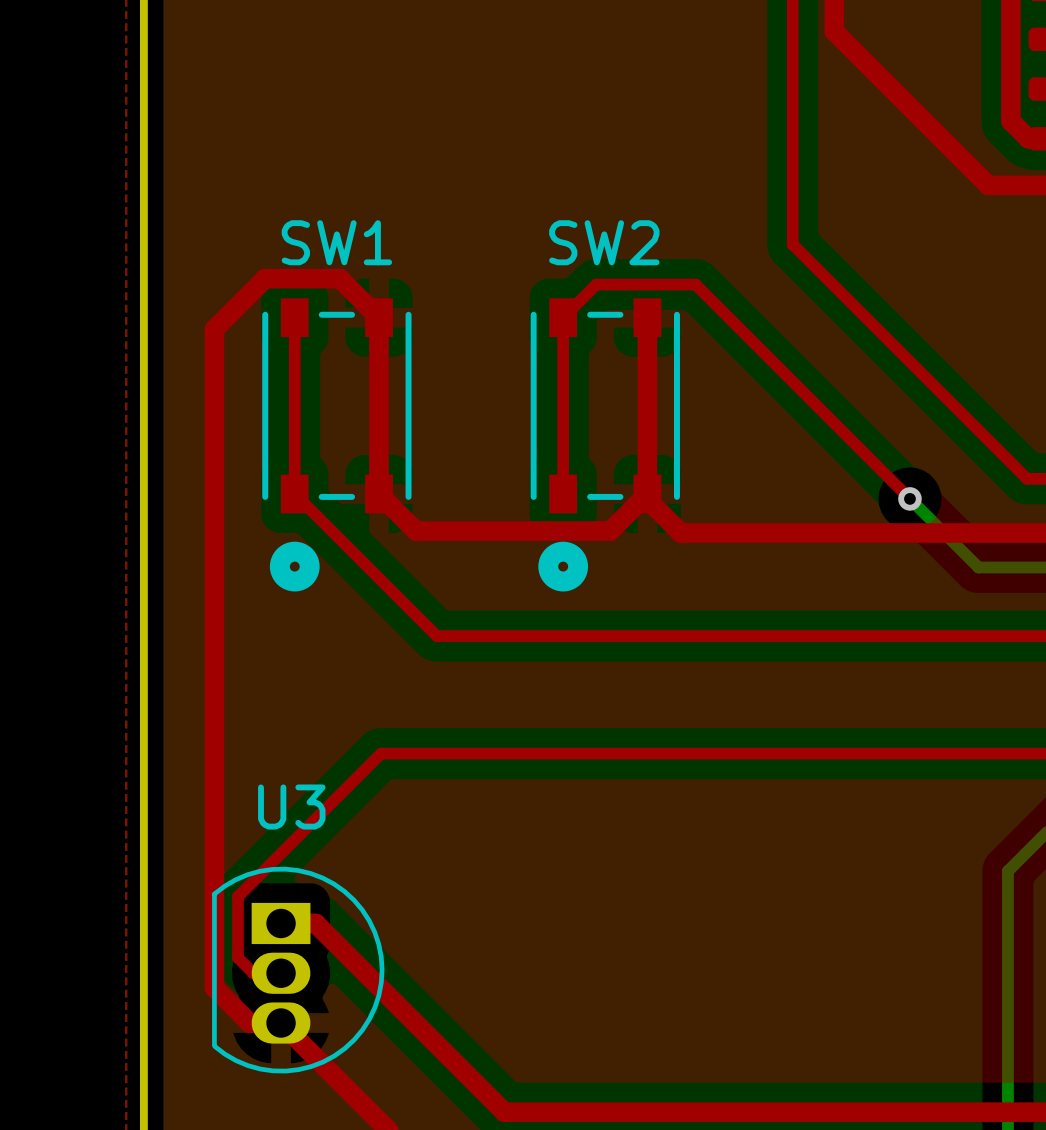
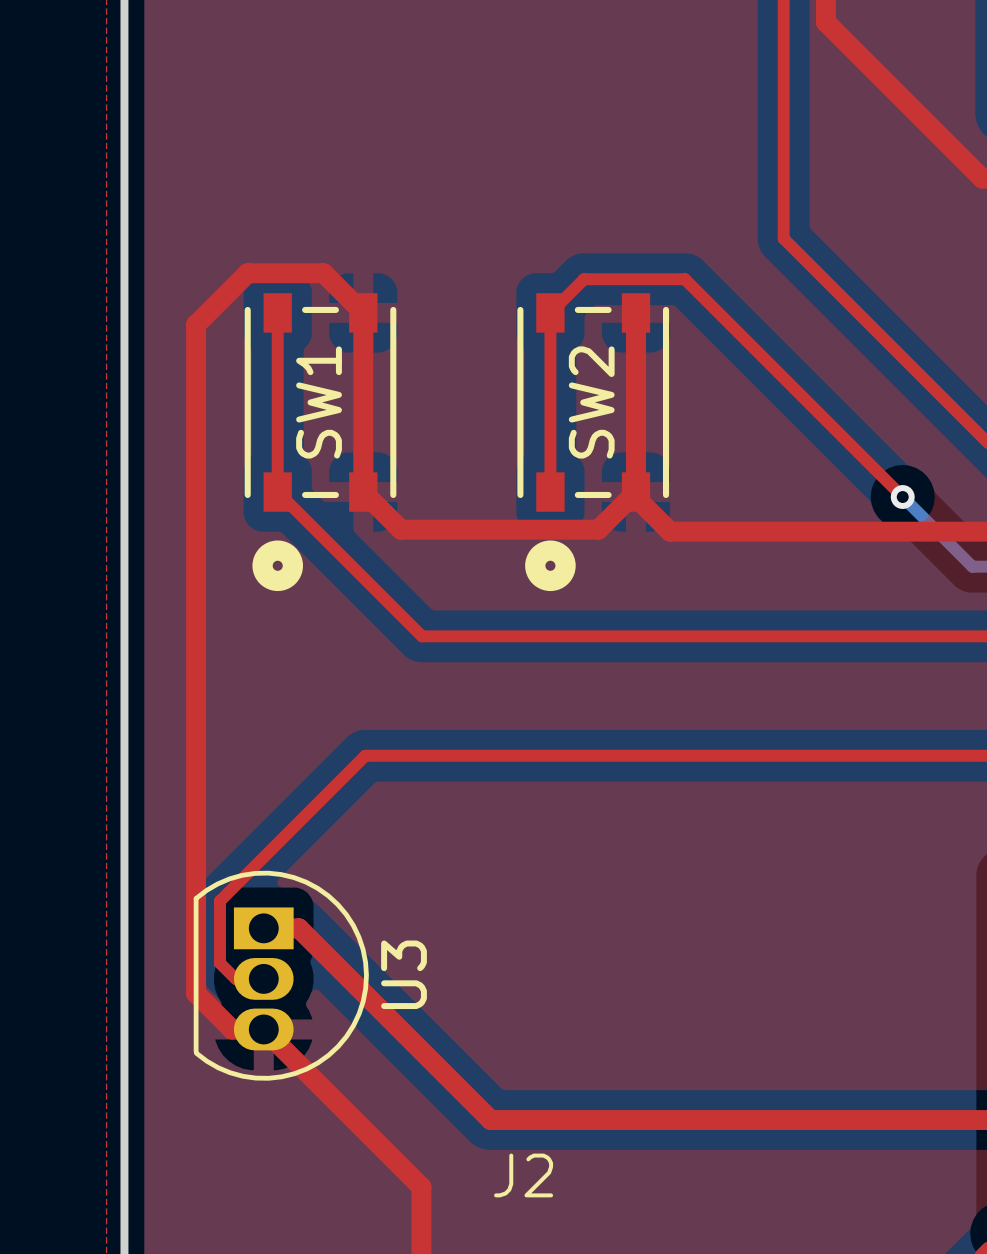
SW1 name rotation: 0° (336, 242) -> 90° counterclockwise (319, 402)
SW1 name position: SW1 (336, 242) -> SW1 (319, 402)
SW2 name rotation: 0° (604, 242) -> 90° counterclockwise (591, 402)
SW2 name position: SW2 (604, 242) -> SW2 (591, 402)
U3 name rotation: 0° (291, 807) -> 90° counterclockwise (404, 974)
U3 name position: U3 (291, 807) -> U3 (404, 974)

